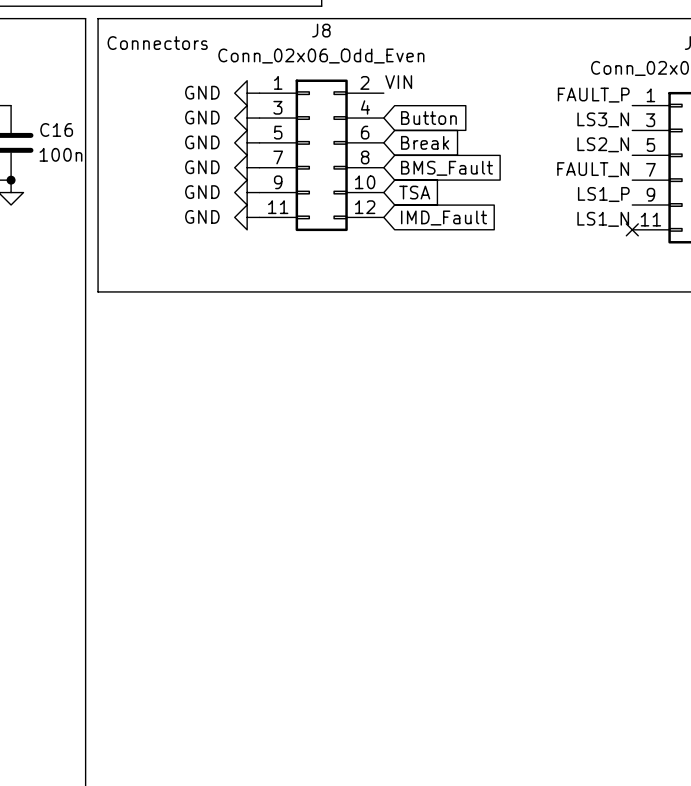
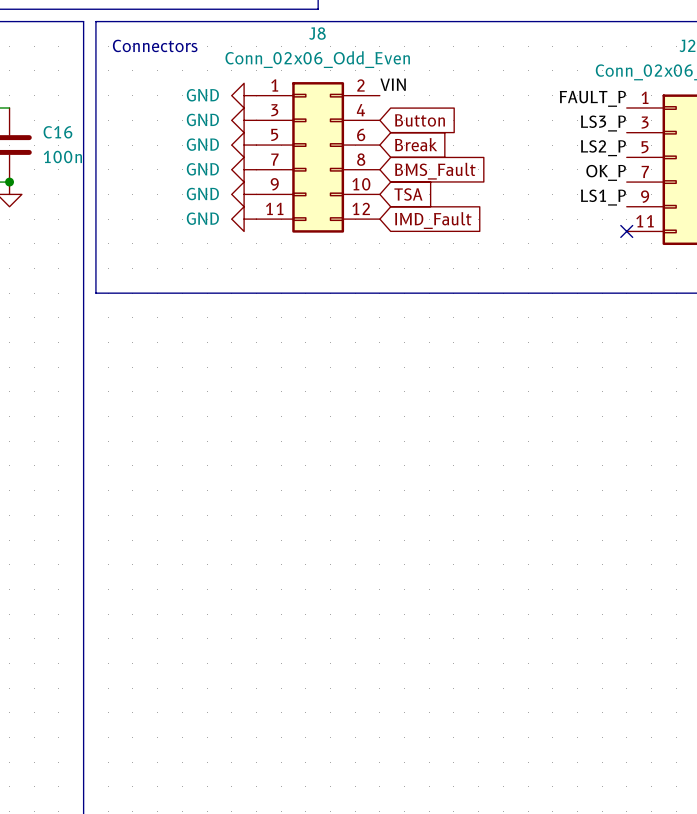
label: LS3_N (603, 119) -> LS3_P (603, 123)
label: LS2_N (603, 144) -> LS2_P (603, 148)
label: FAULT_N (593, 169) -> OK_P (606, 172)
label: LS1_N (603, 219) -> none

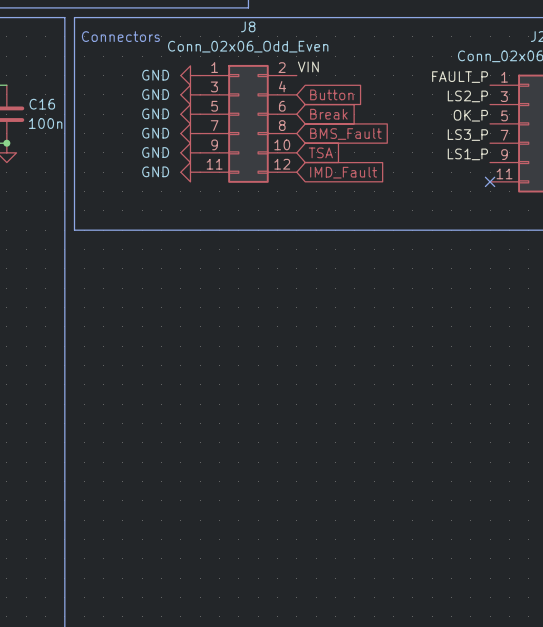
label: LS3_P (603, 123) -> LS2_P (467, 96)
label: LS2_P (603, 148) -> OK_P (470, 115)
label: OK_P (606, 172) -> LS3_P (467, 135)

